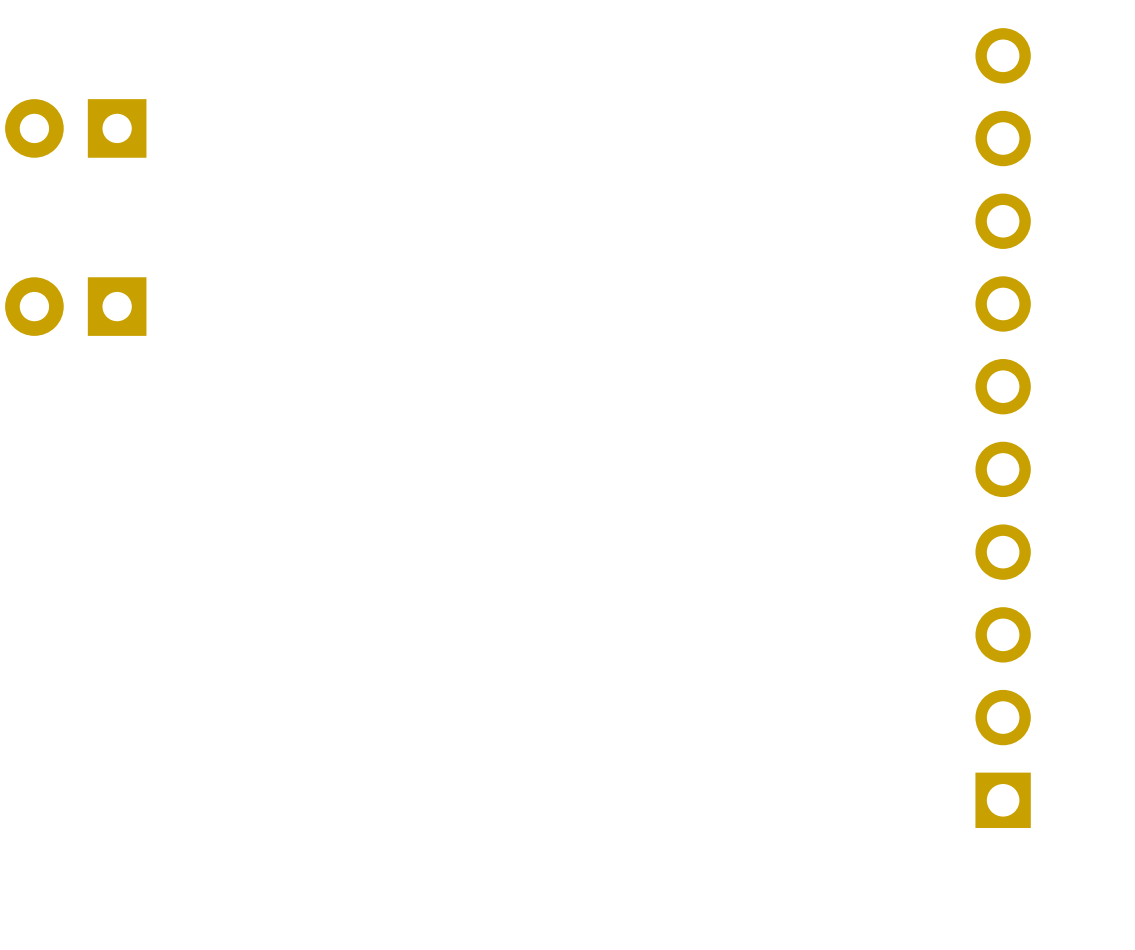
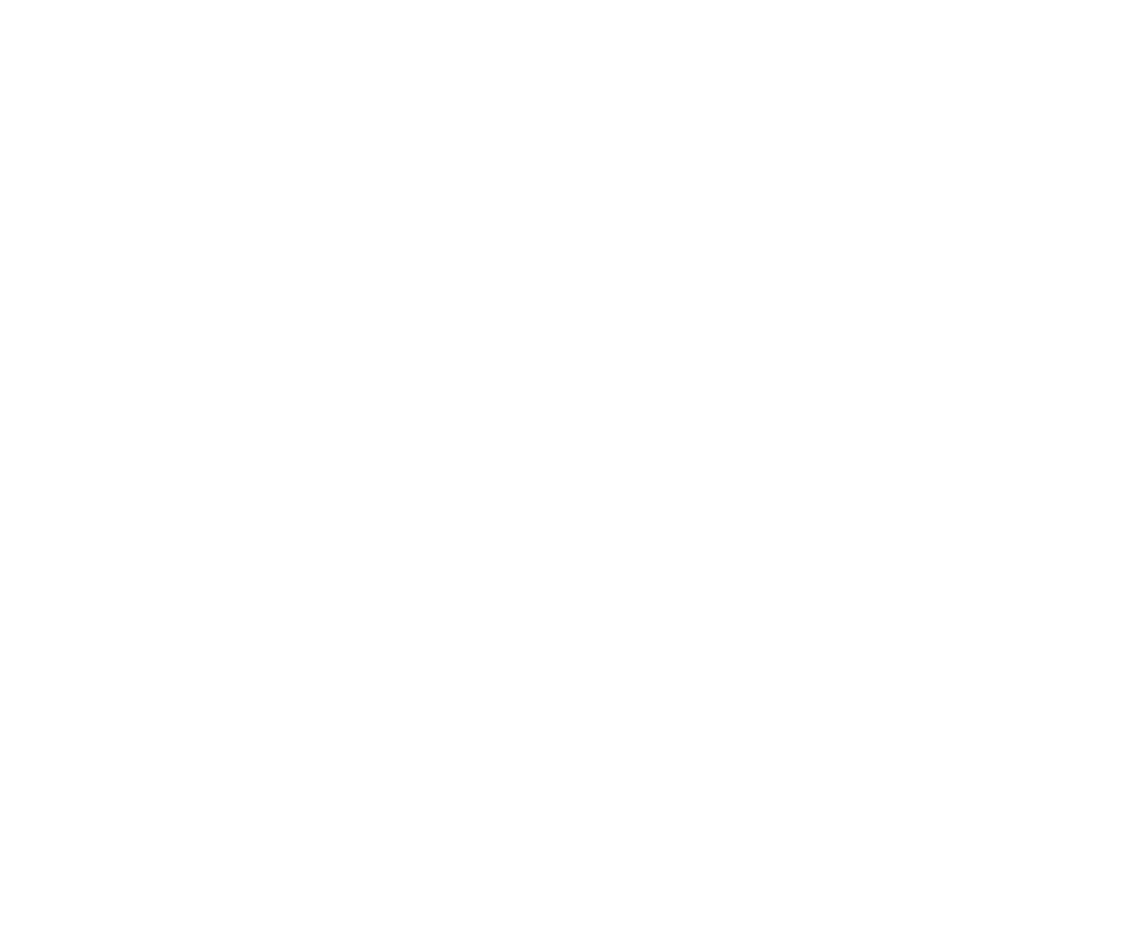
part: (75, 128) -> none
part: (75, 306) -> none
part: (1003, 428) -> none

